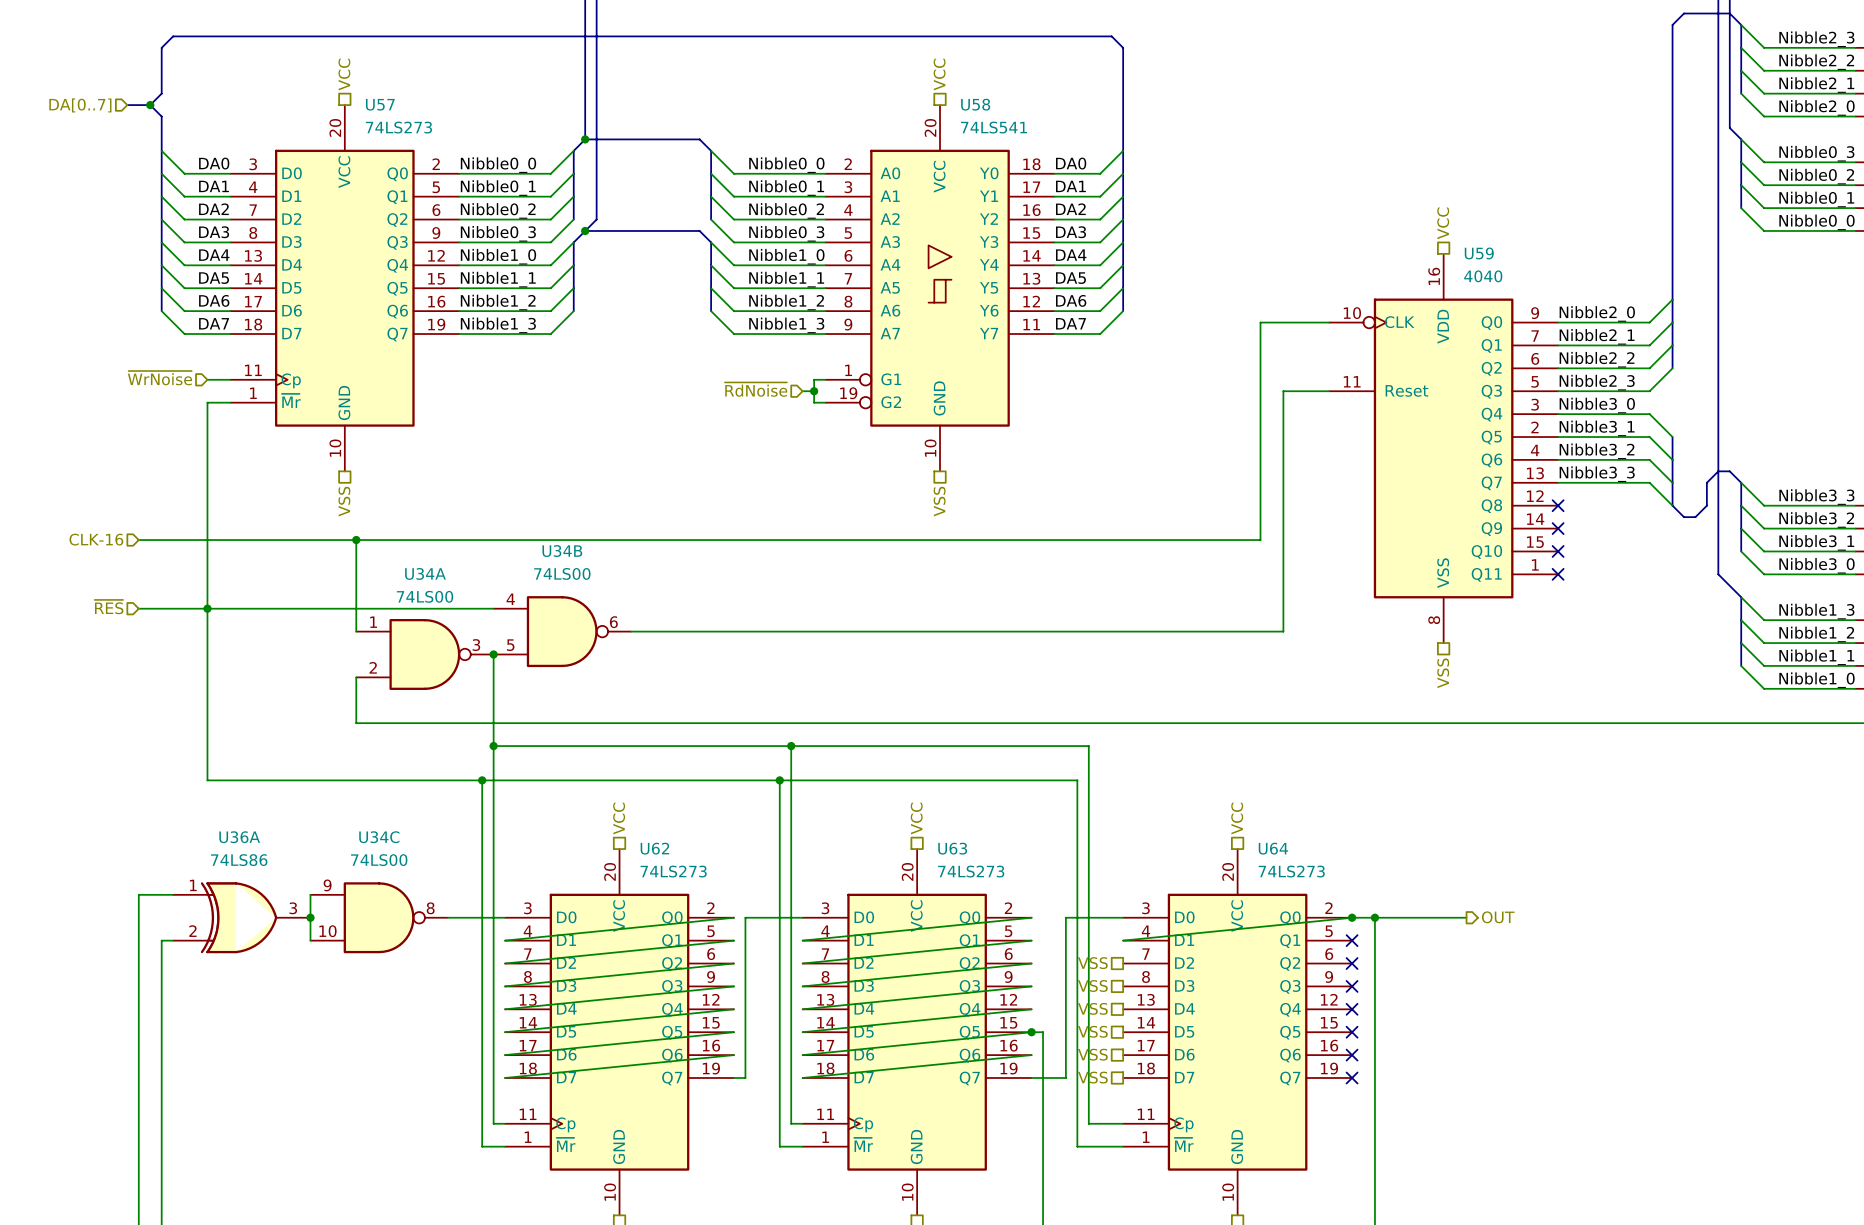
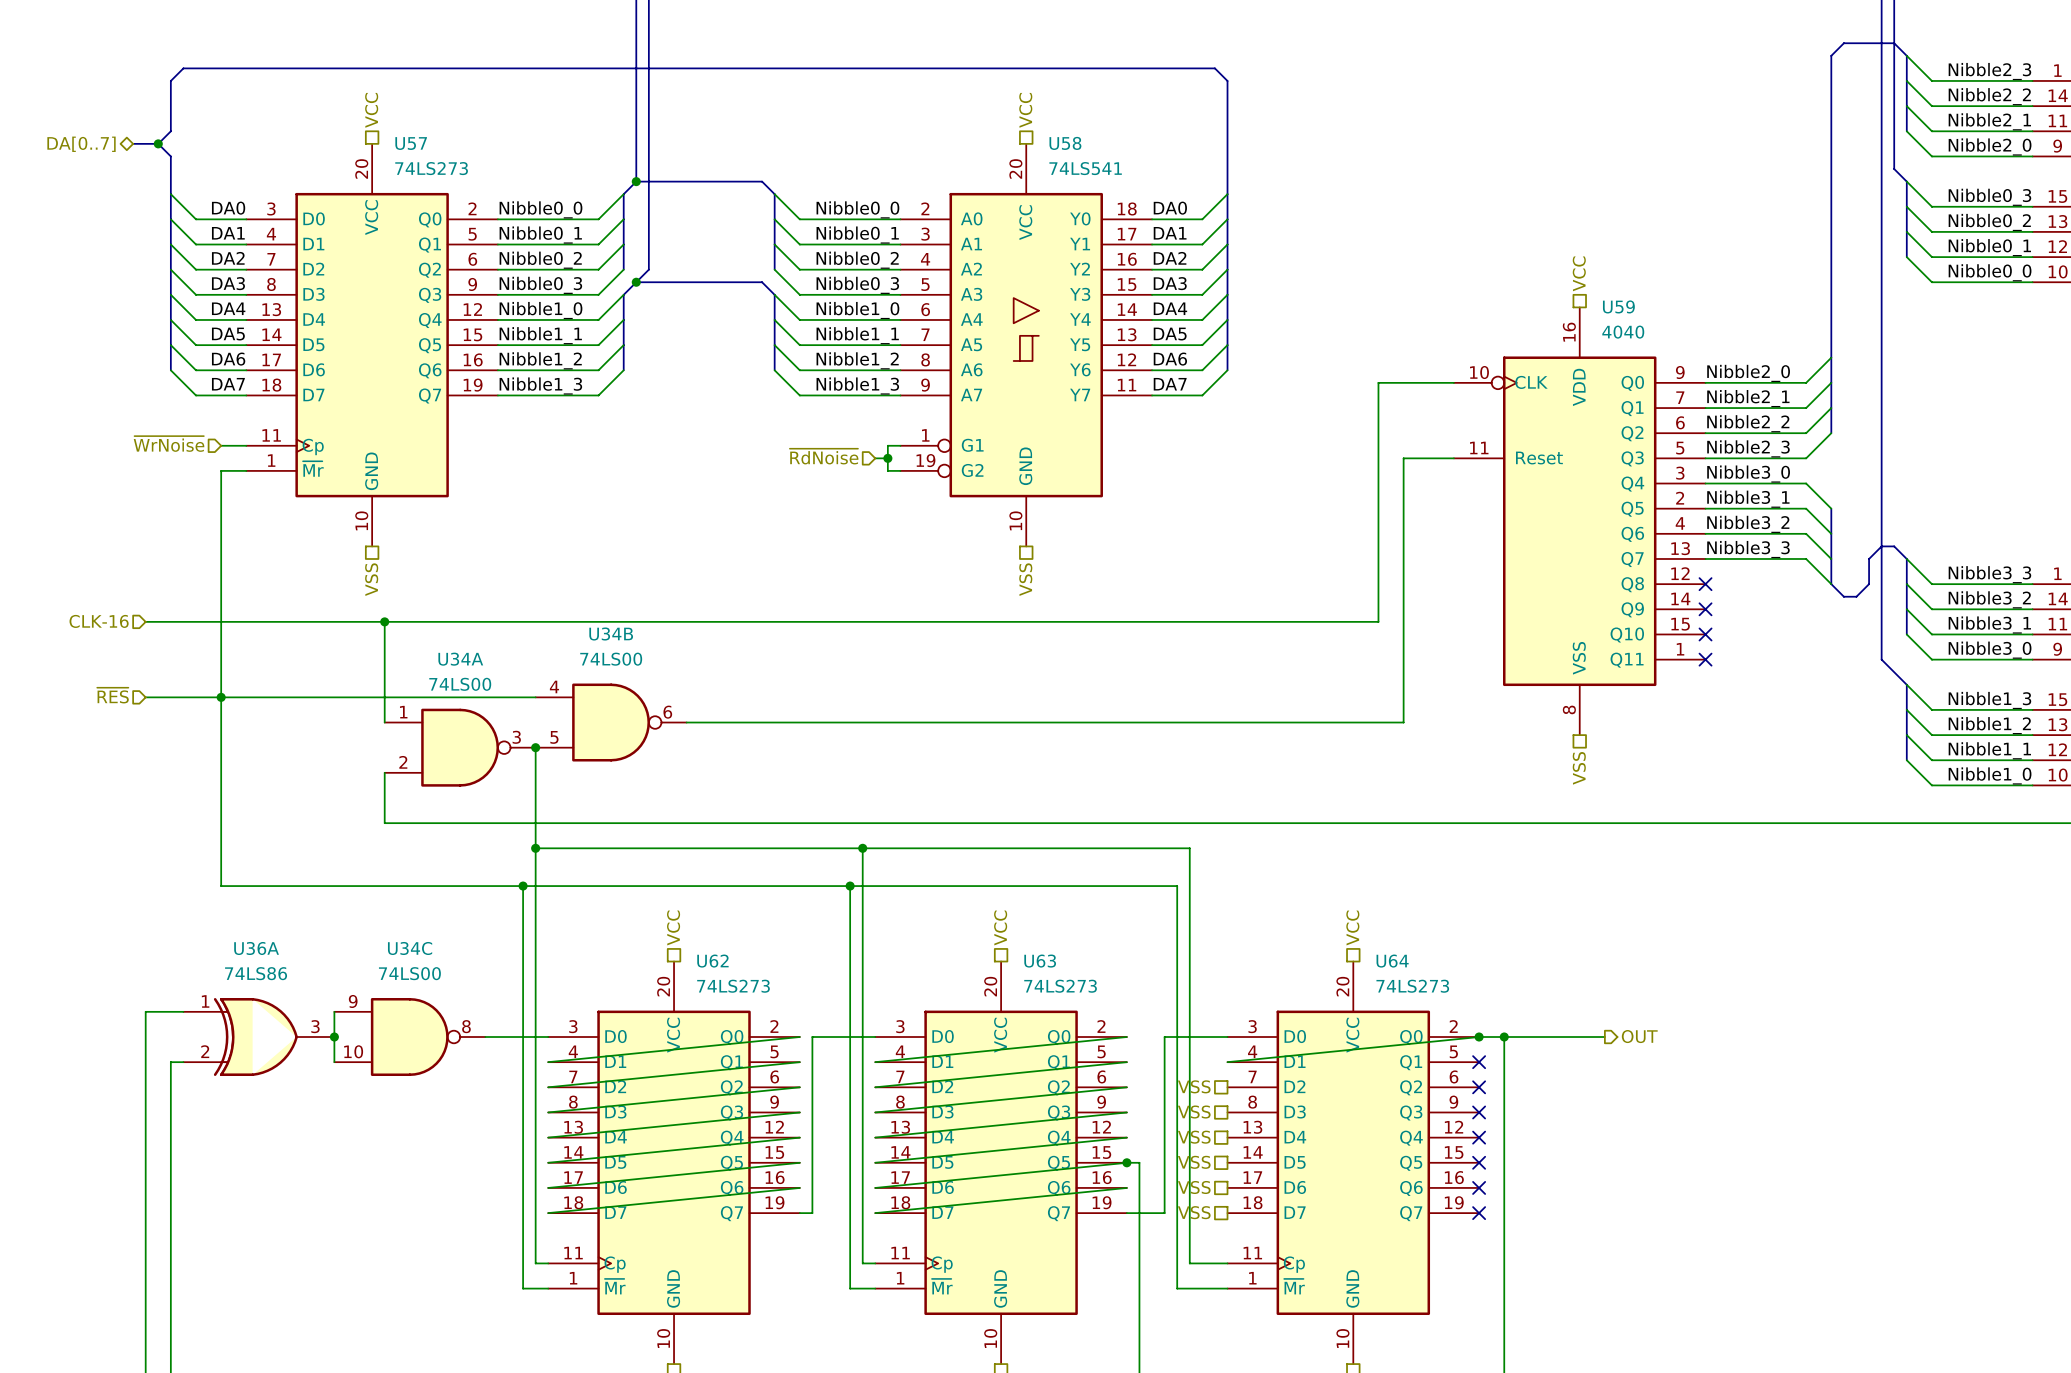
hierarchical label shape: input (80, 105) -> bidirectional (81, 144)

